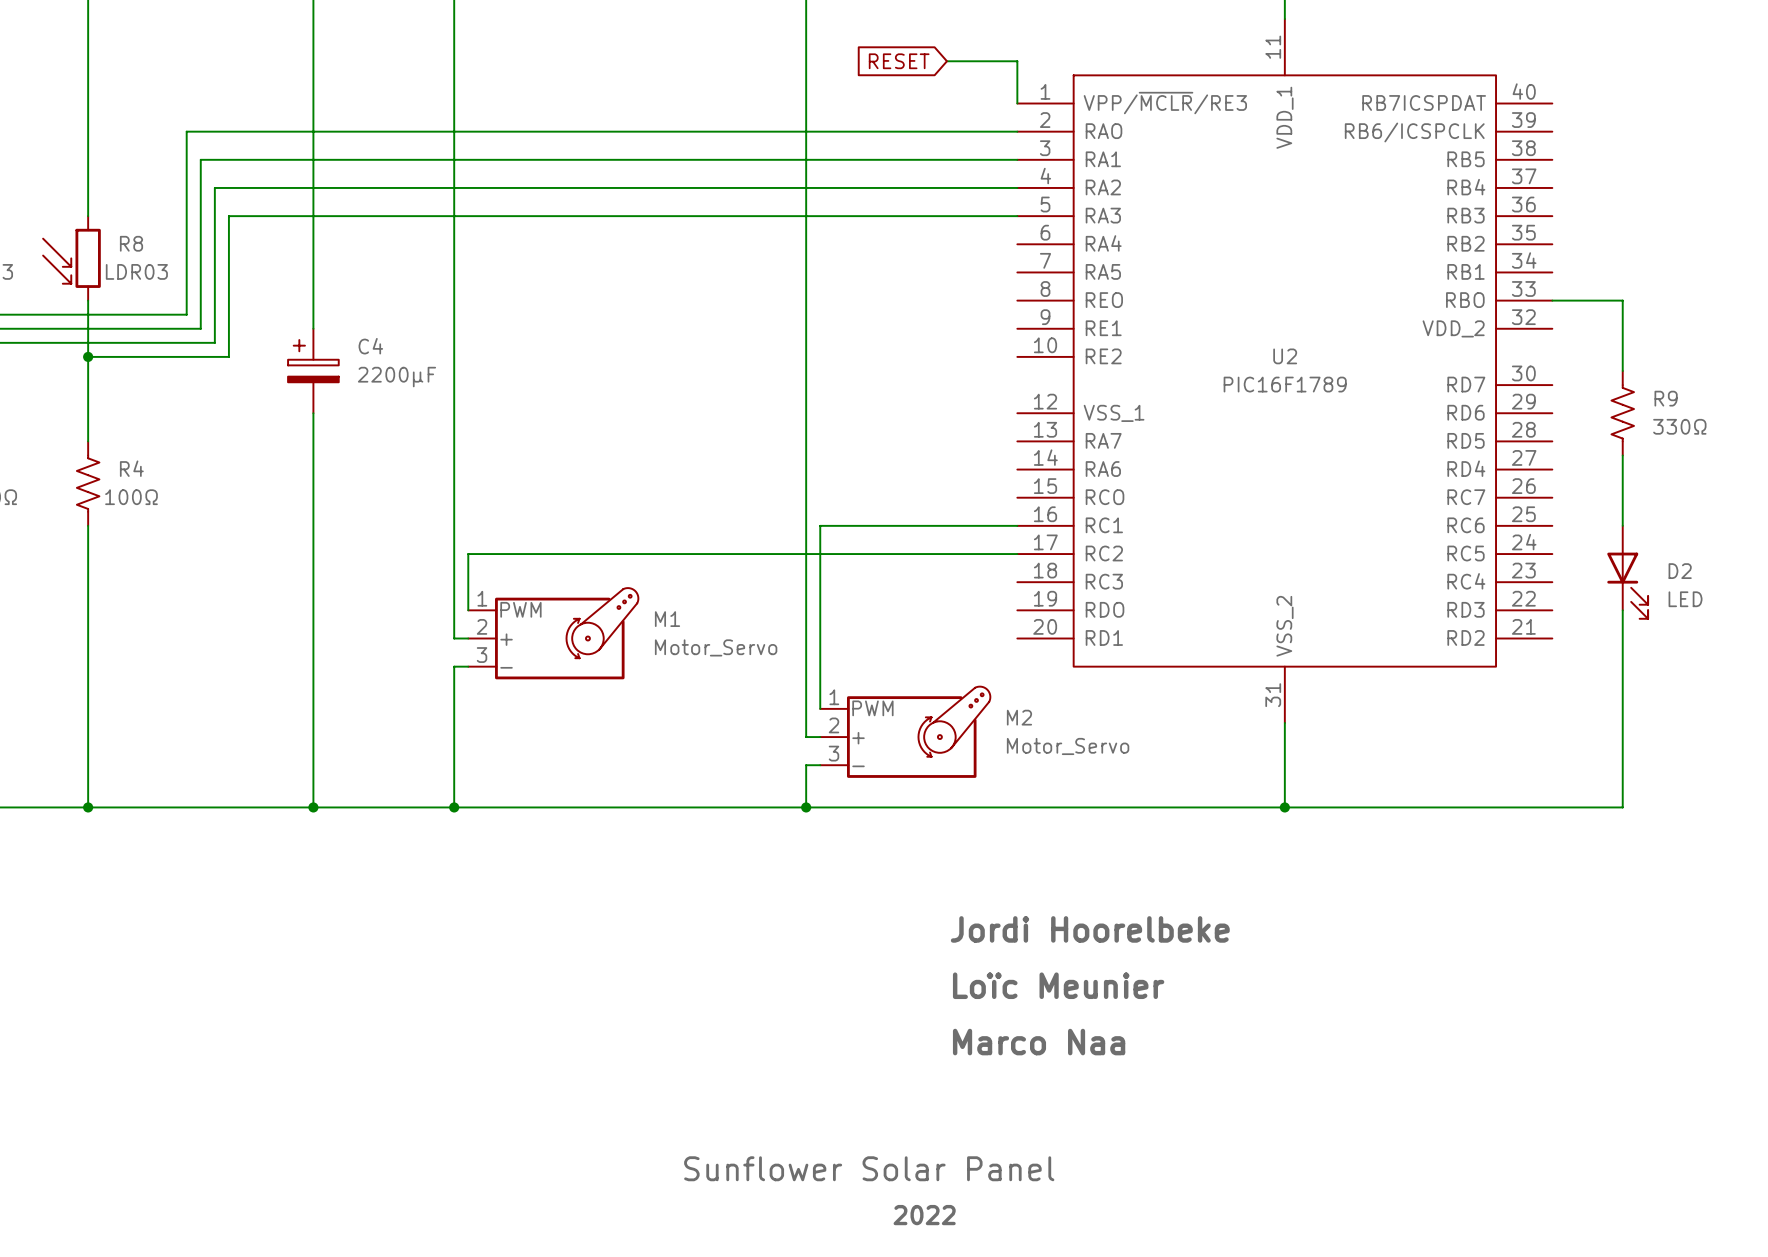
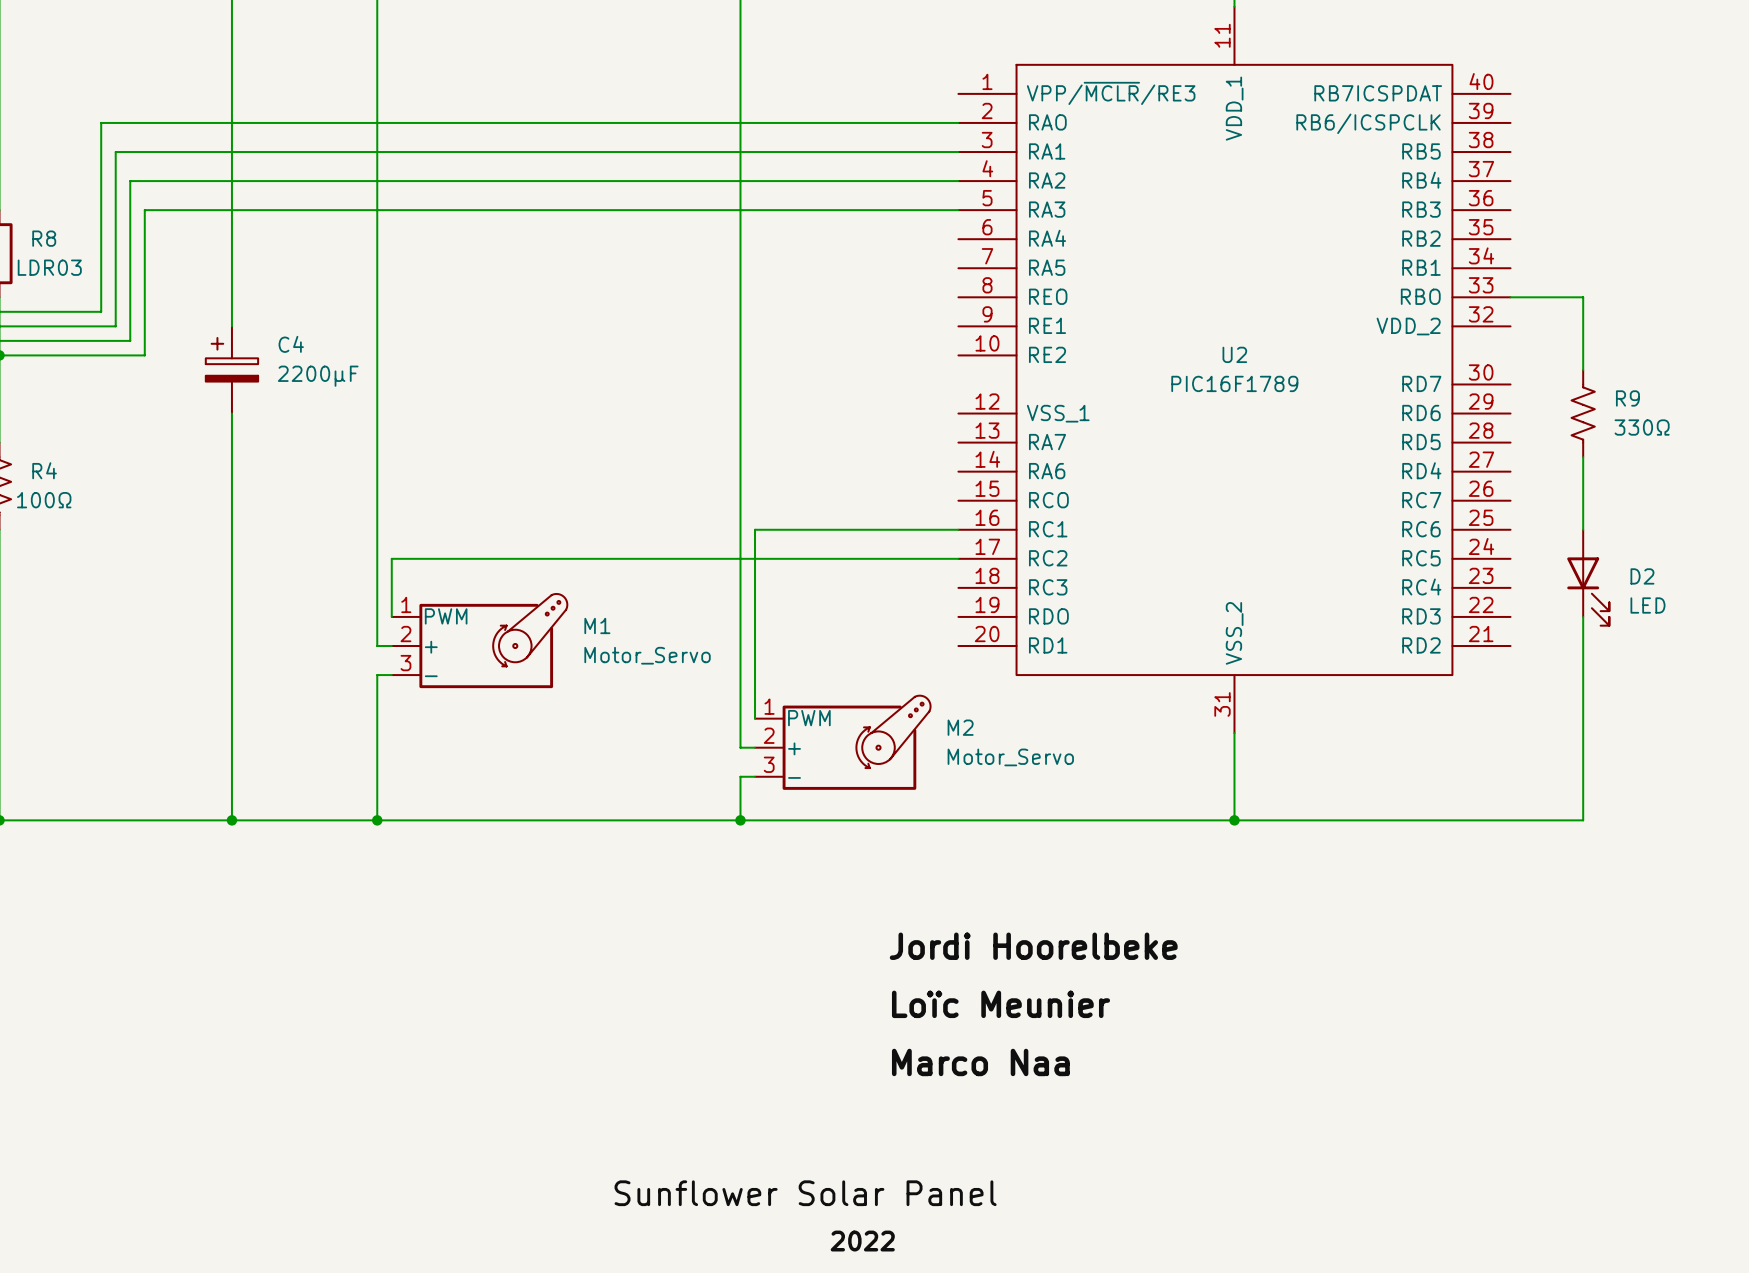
global label: RESET (899, 61) -> none
wire: (946, 61) (1017, 61) (1017, 103) -> none

